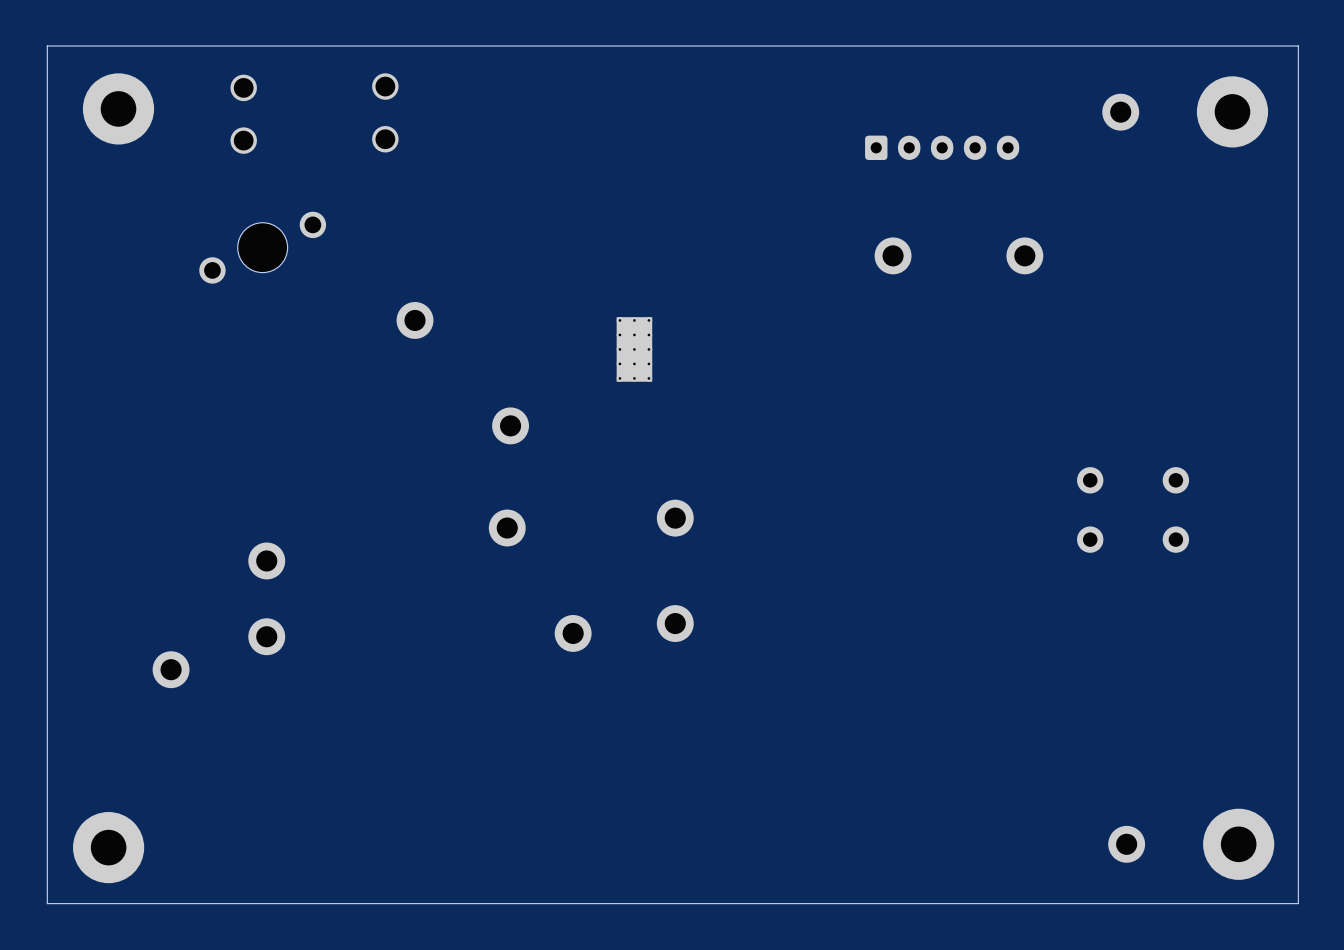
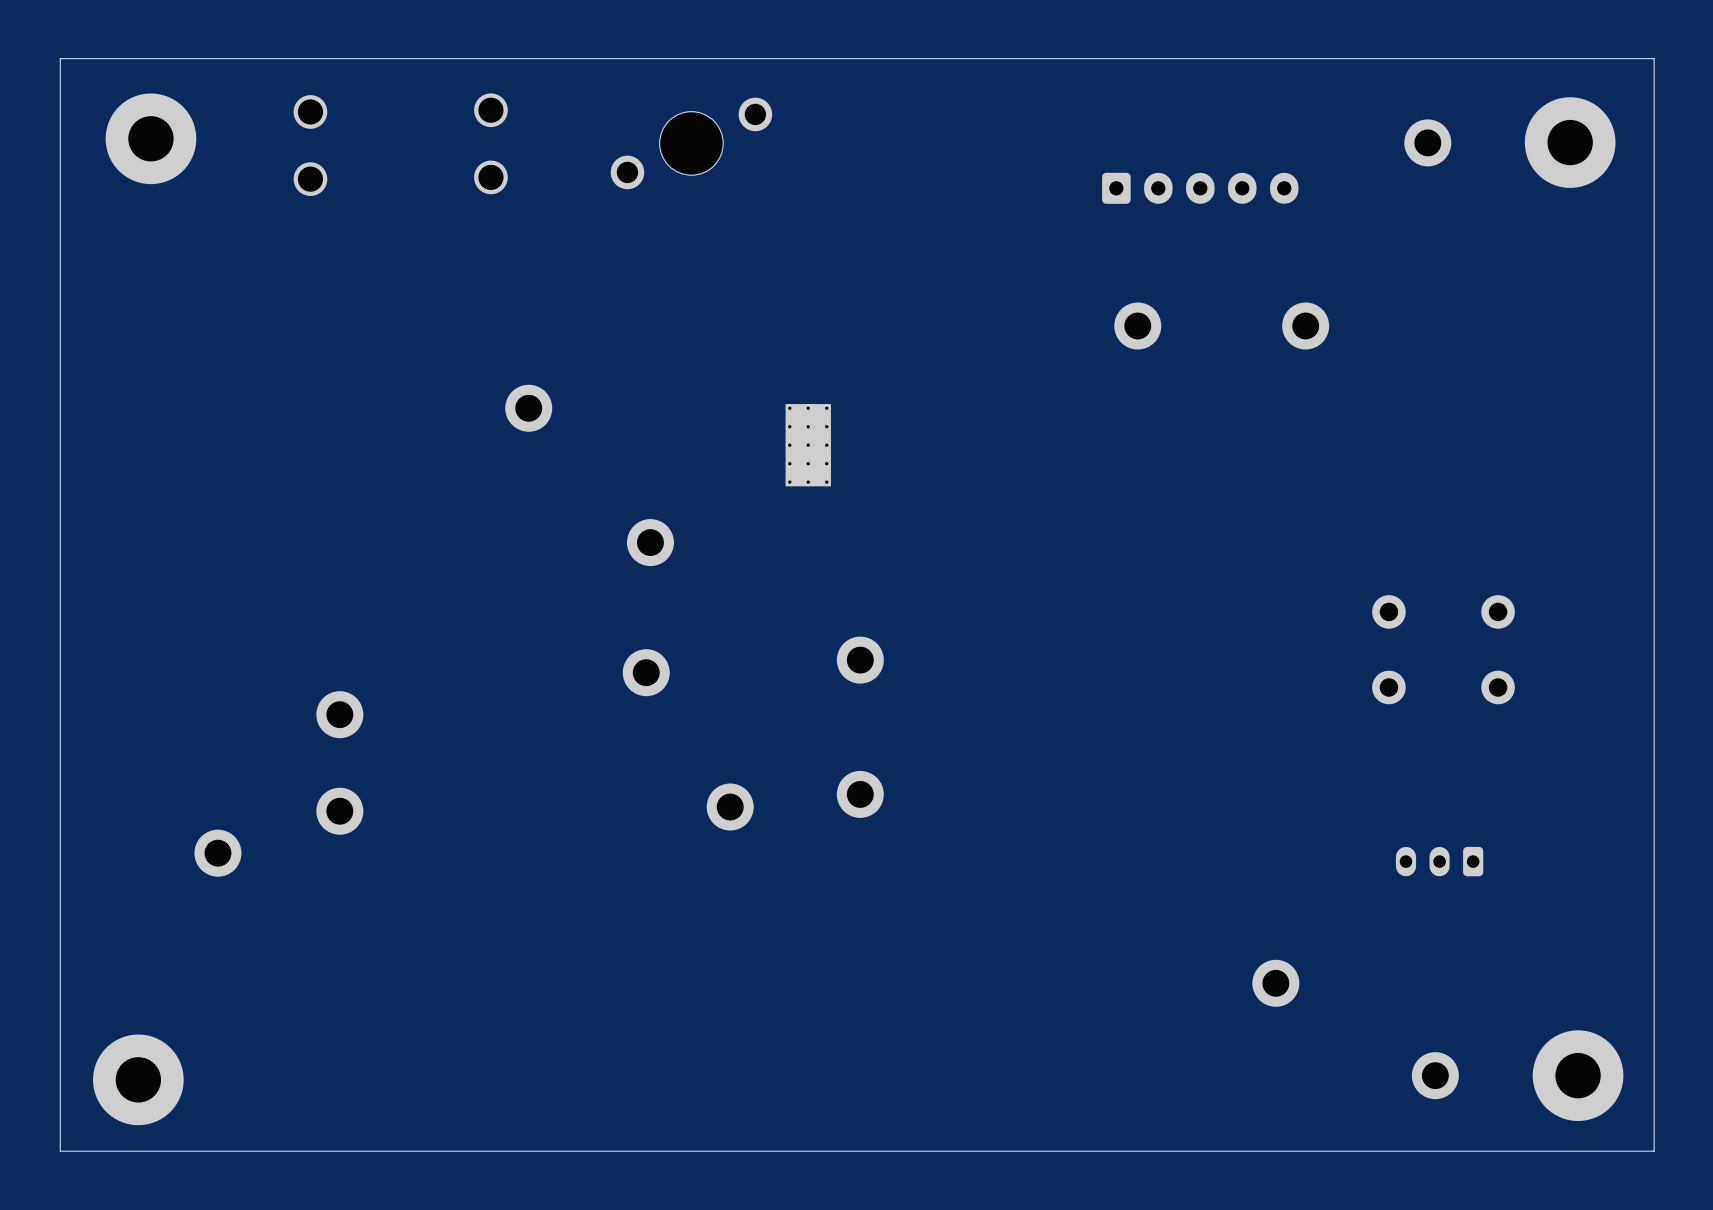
part position: (262, 247) -> (691, 143)
part: none -> (1439, 861)
part: none -> (1275, 983)

